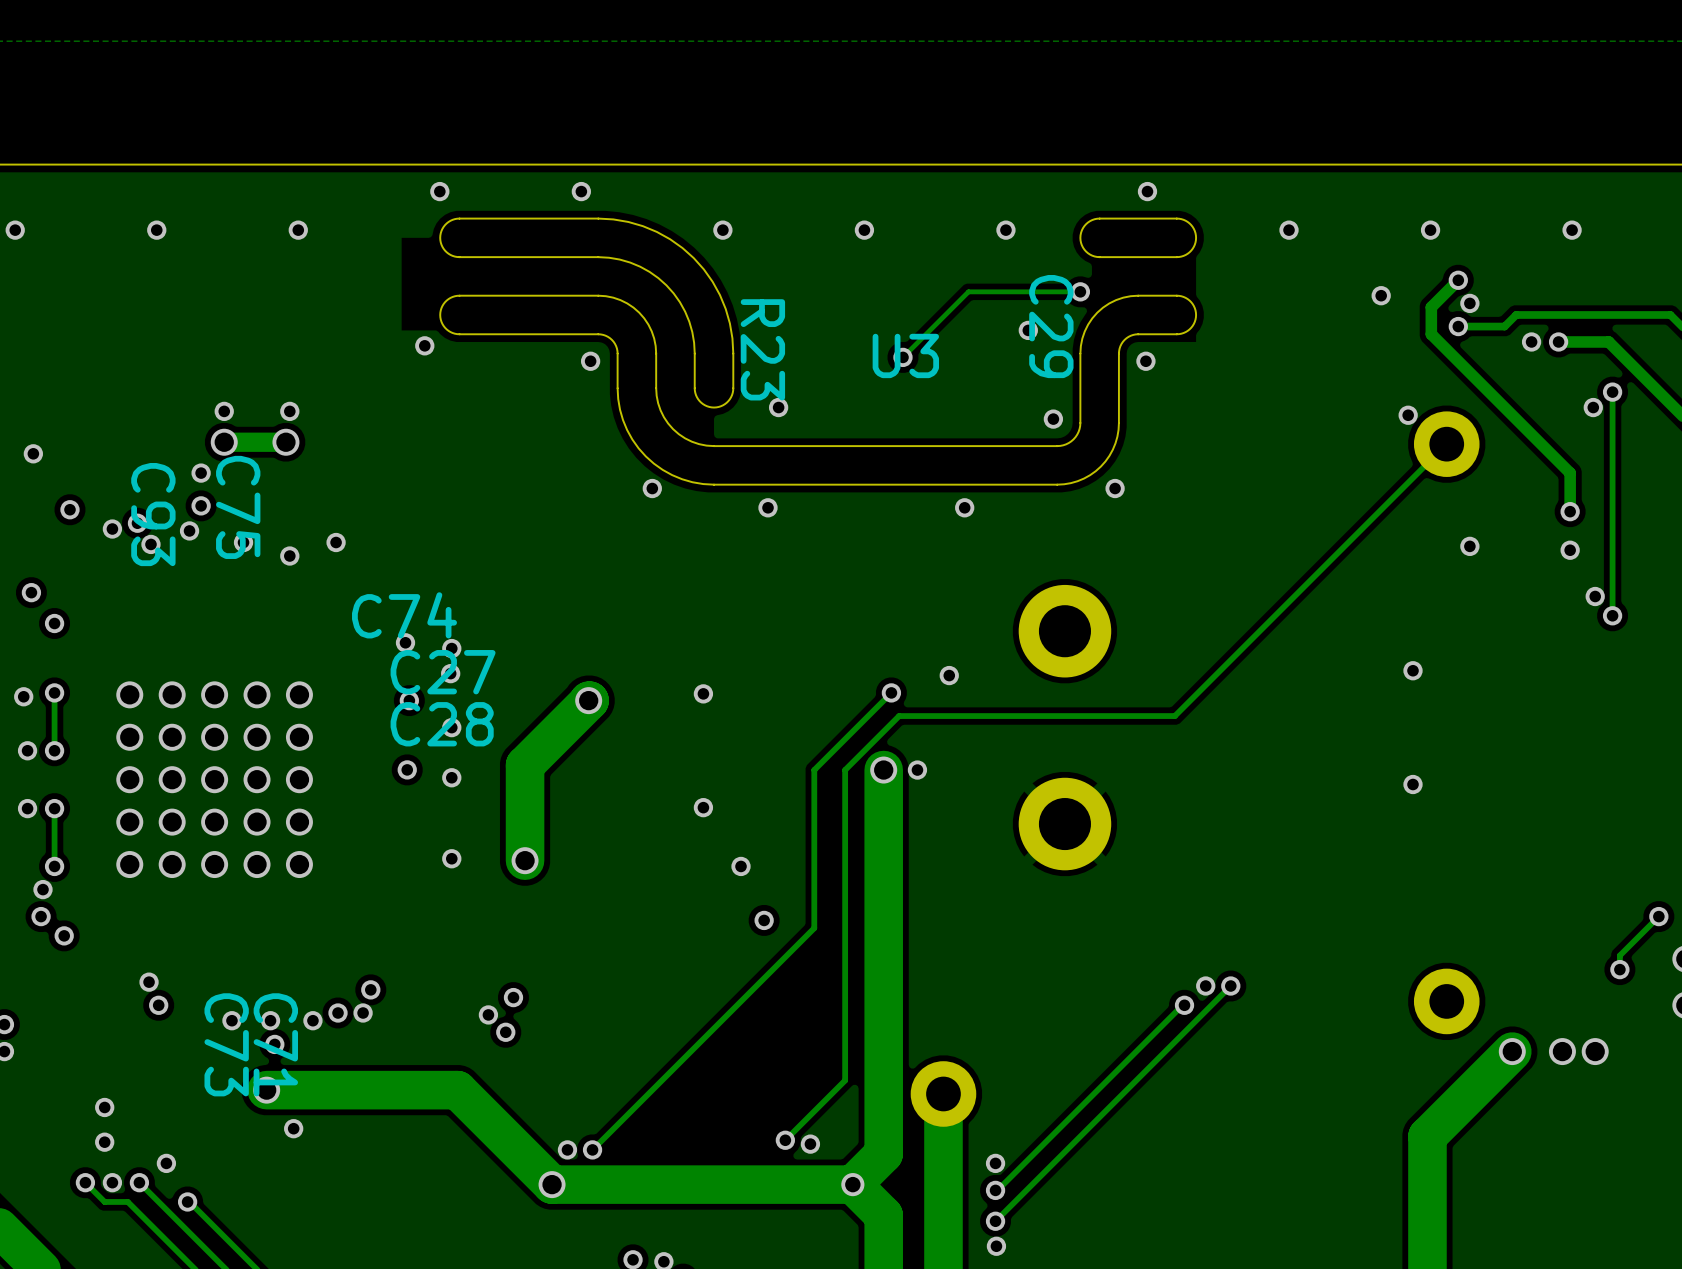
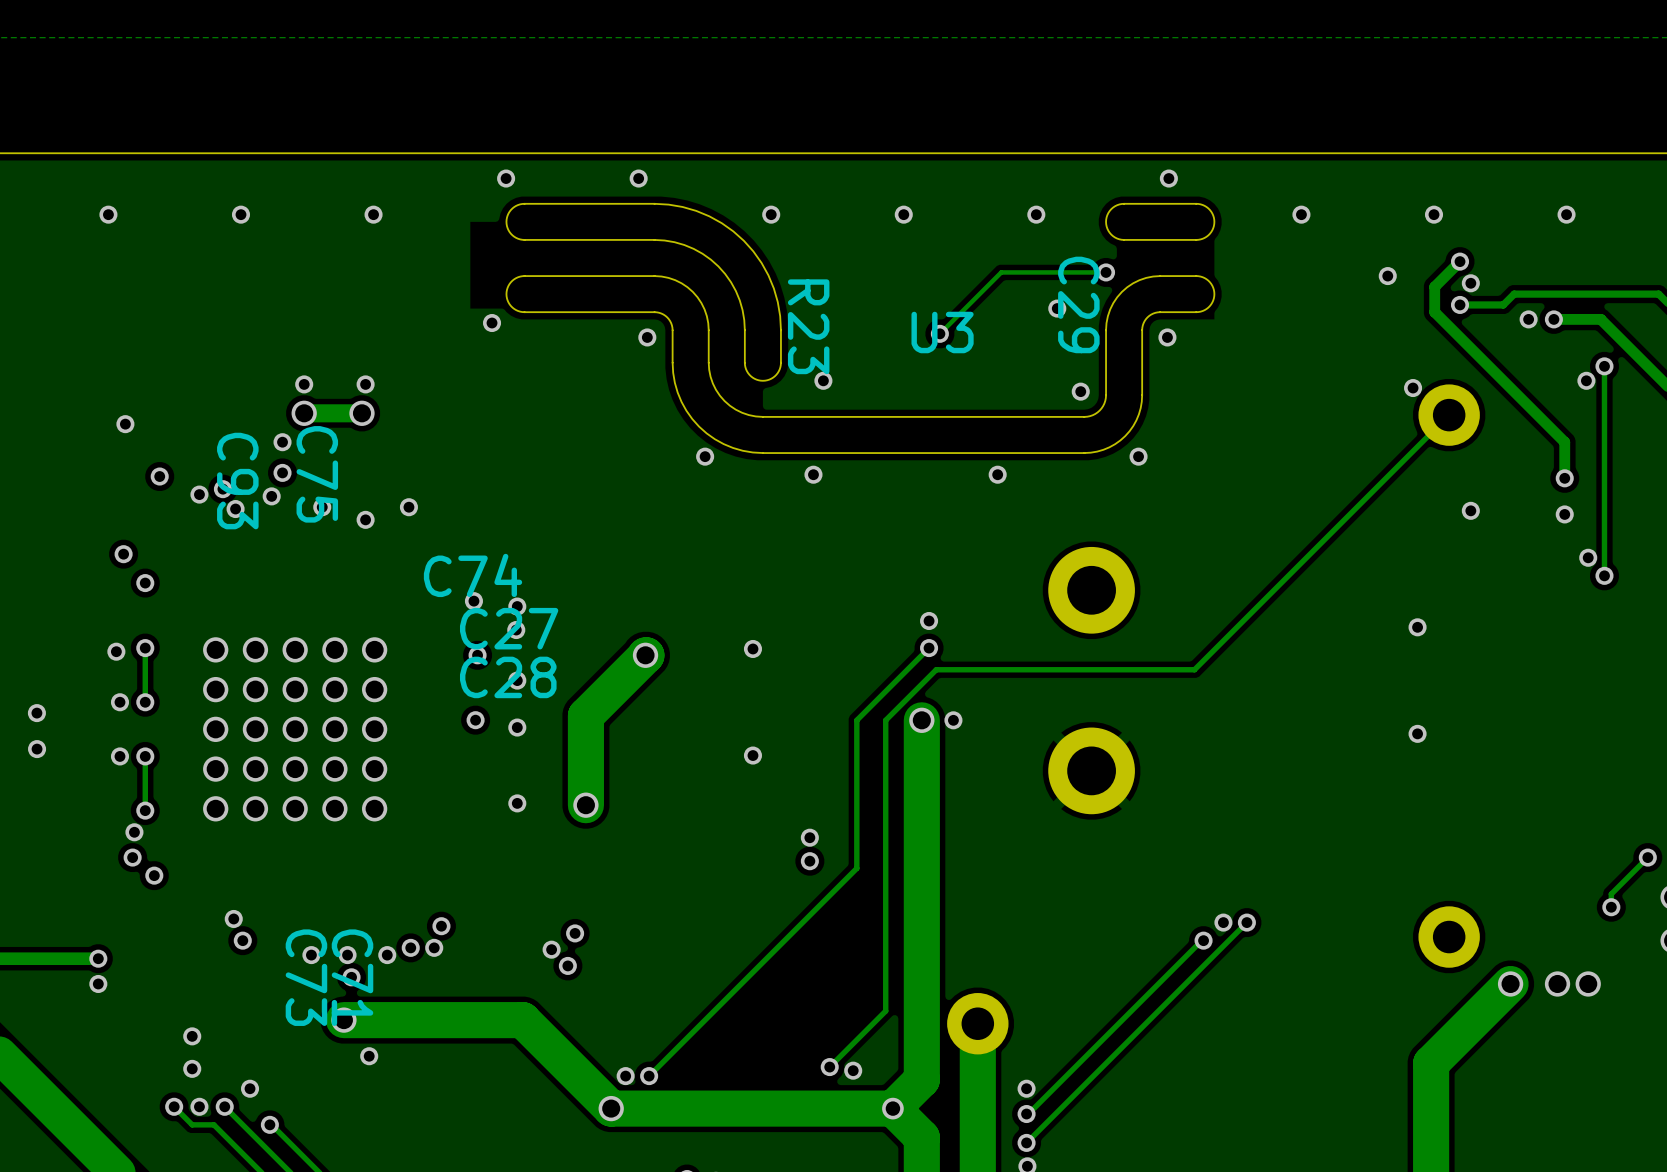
via position: (949, 675) -> (929, 620)
via position: (741, 866) -> (809, 837)

